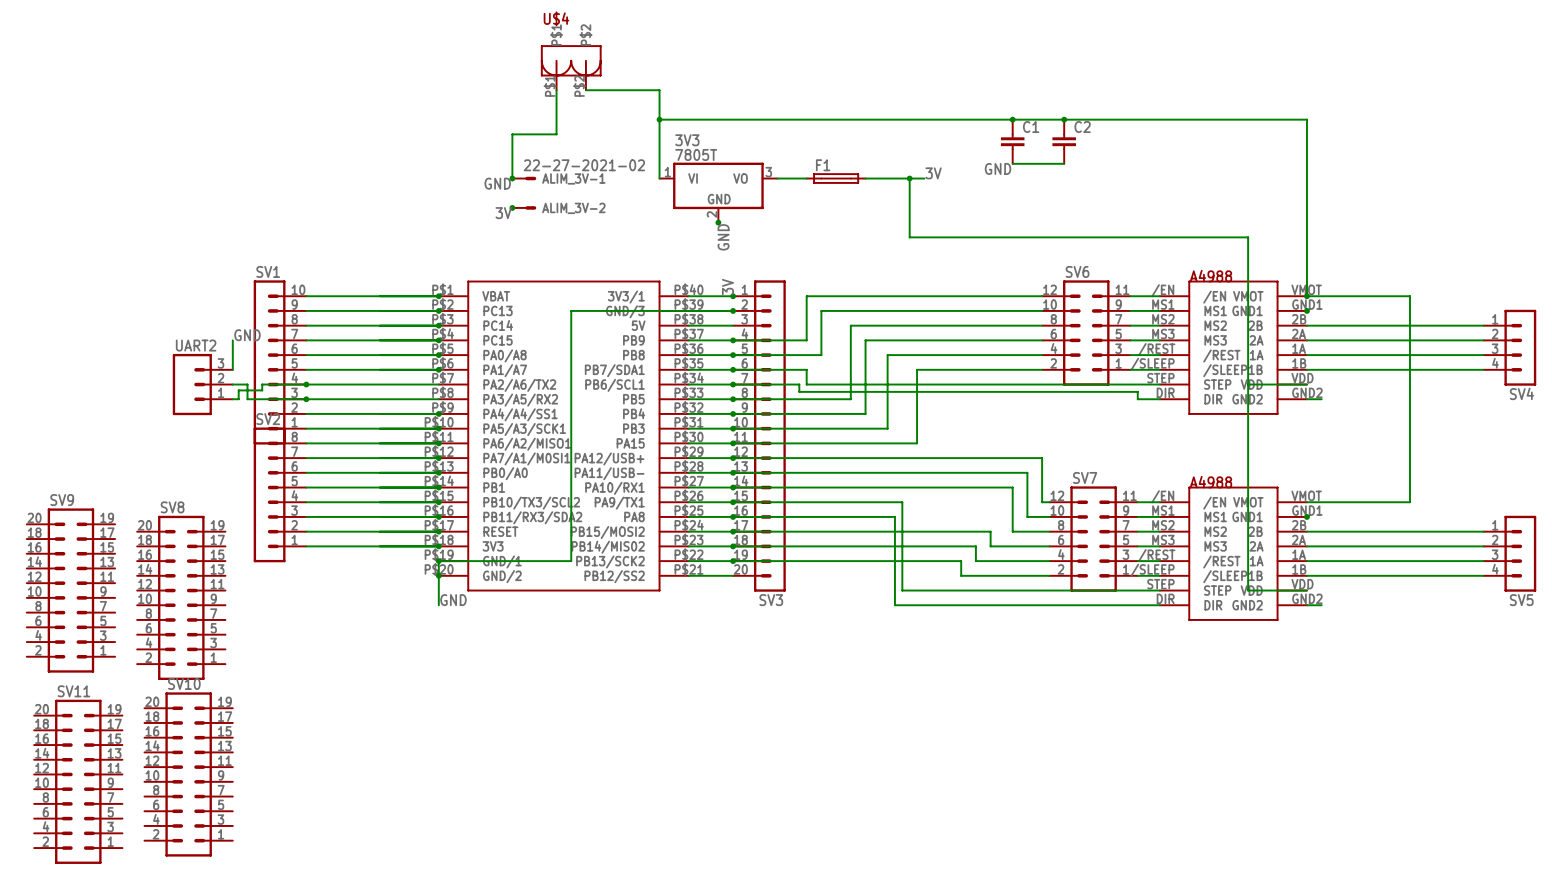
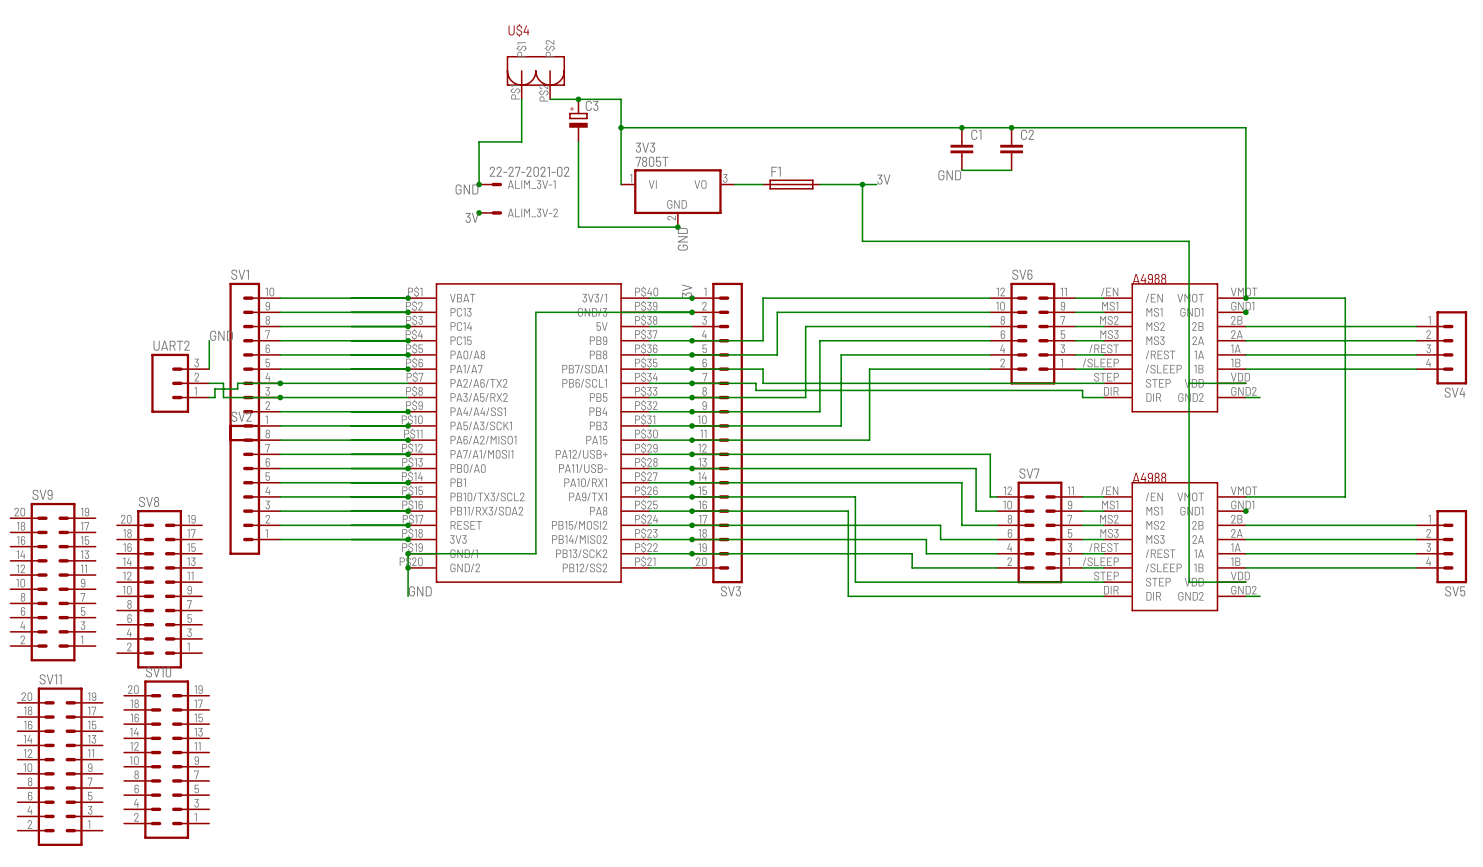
junction: none -> (578, 99)
C3: none -> (578, 120)
wire: none -> (578, 141) (578, 227) (677, 227)

